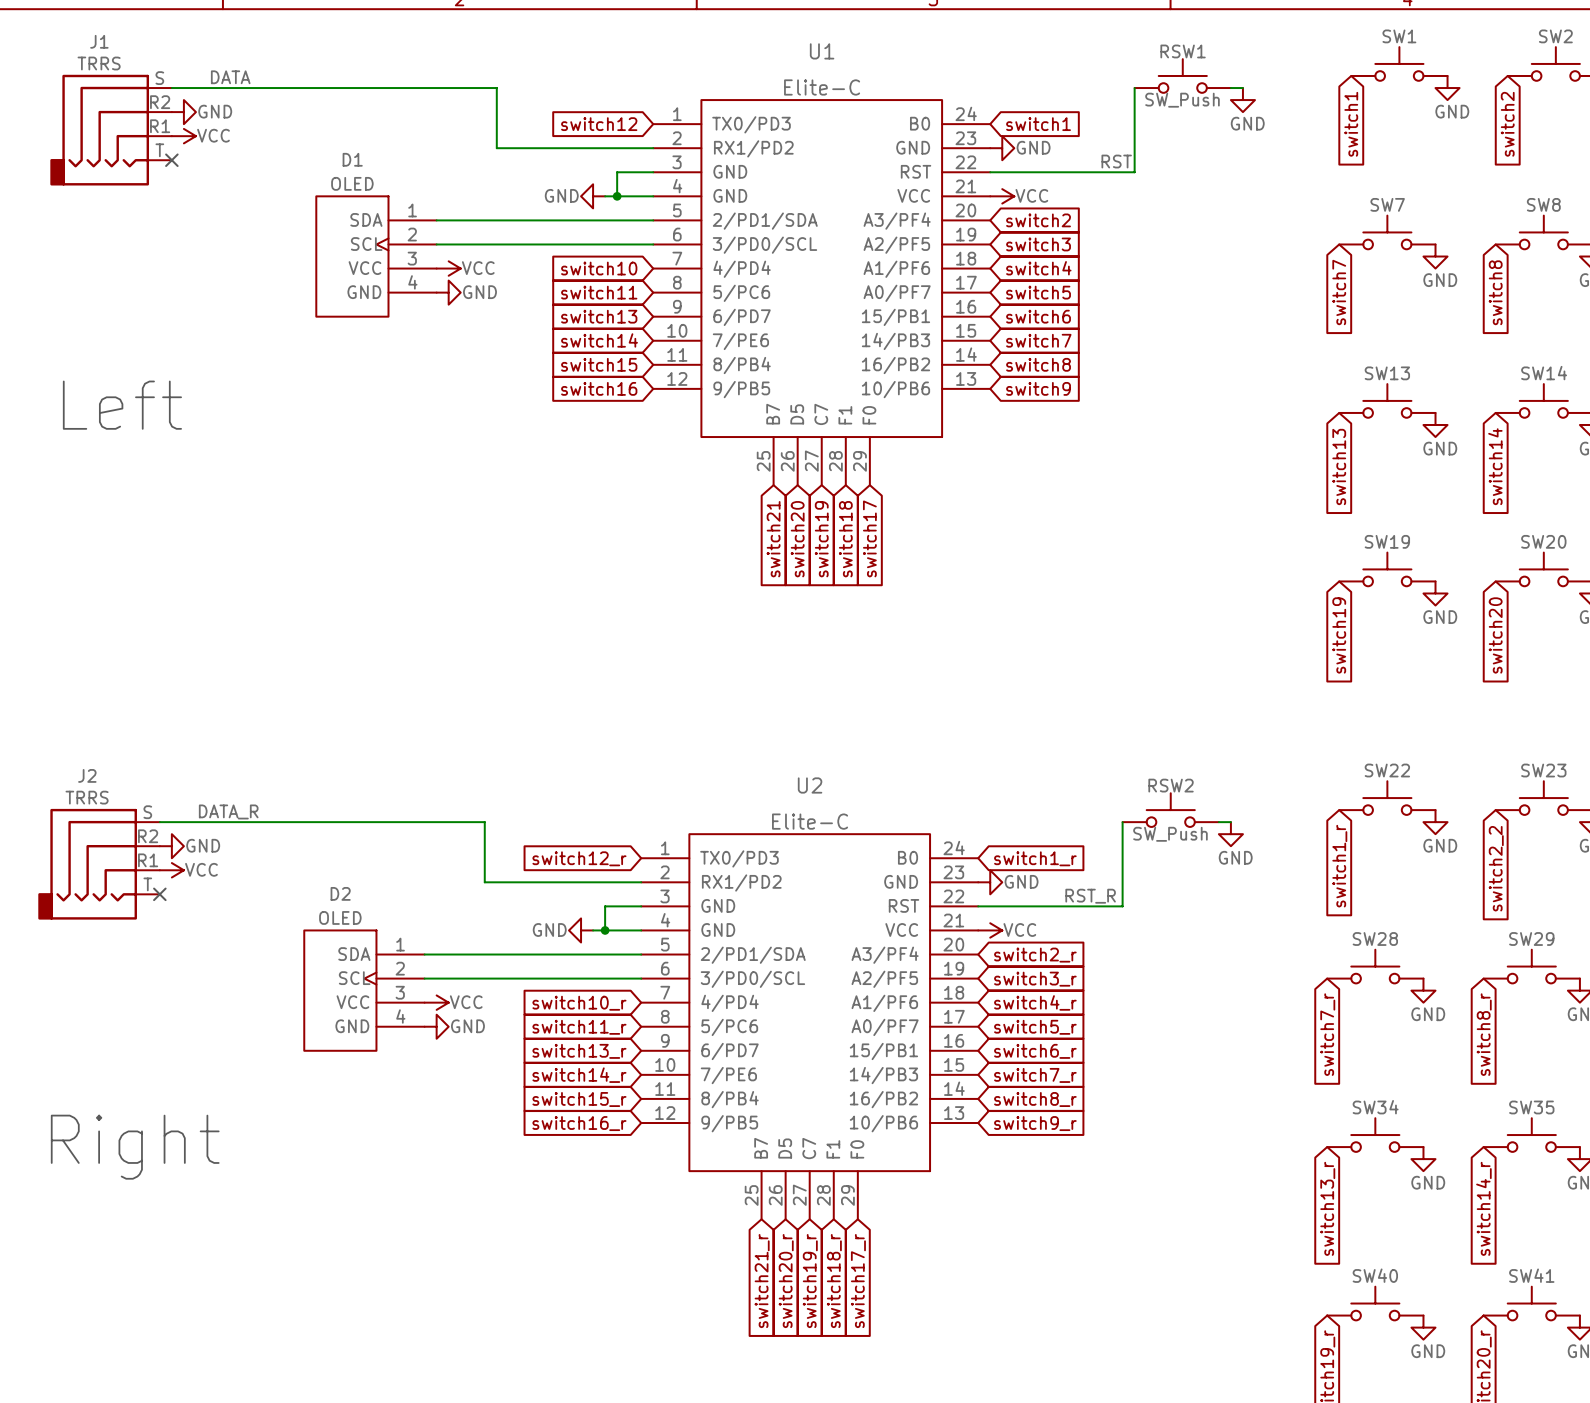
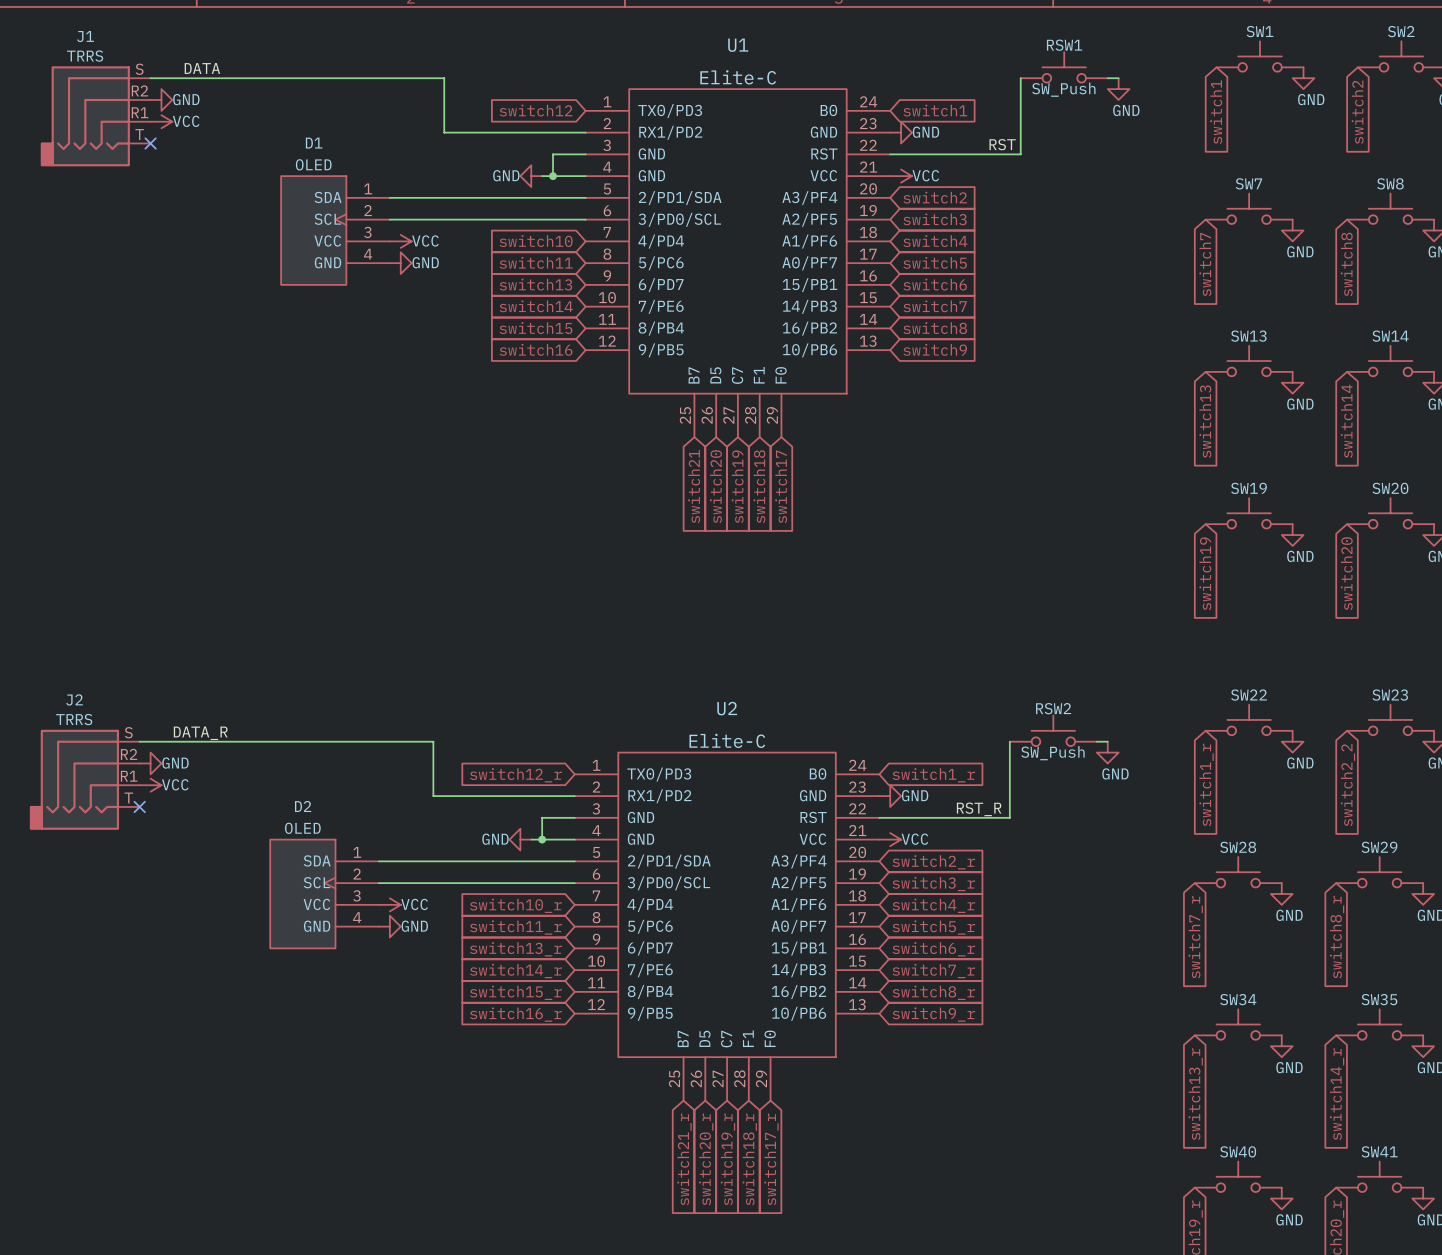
text: Left (122, 405) -> none
text: Right (135, 1147) -> none

